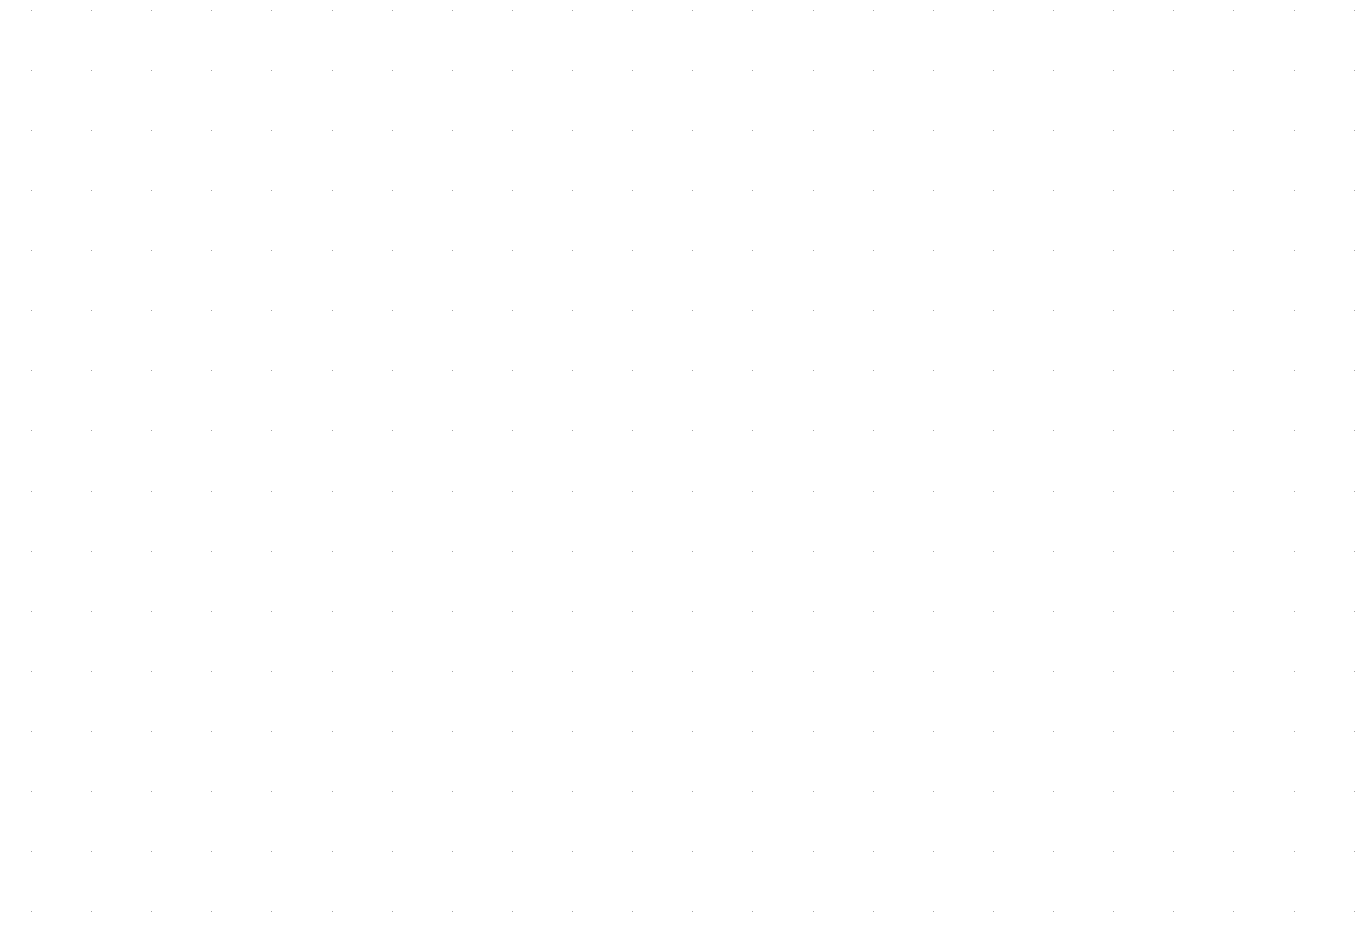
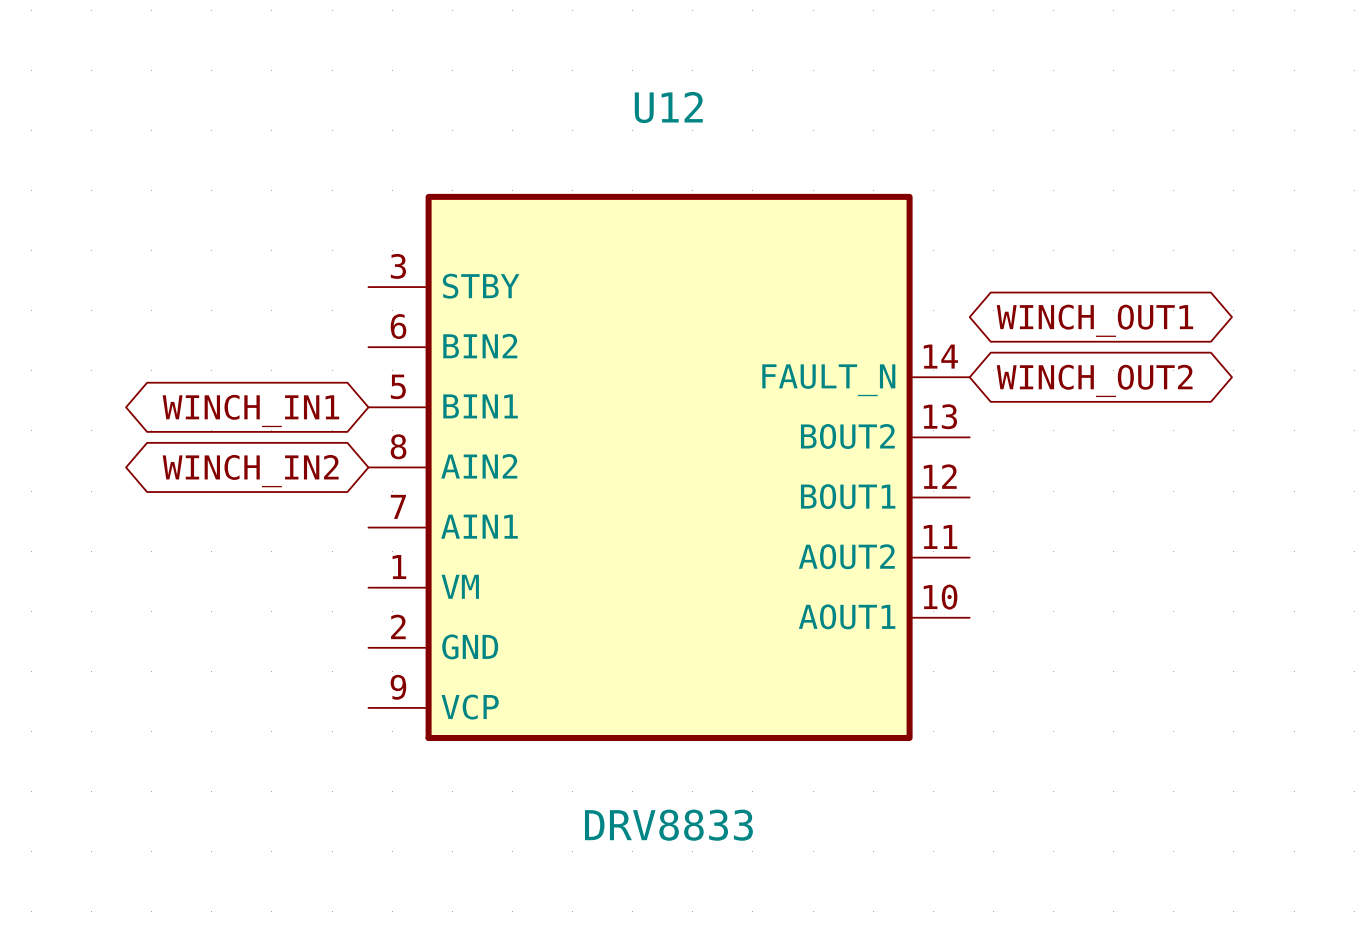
global label: none -> WINCH_OUT1 (1094, 320)
global label: none -> WINCH_OUT2 (1094, 380)
global label: none -> WINCH_IN1 (250, 410)
U12: none -> DRV8833 (669, 467)
global label: none -> WINCH_IN2 (250, 471)

